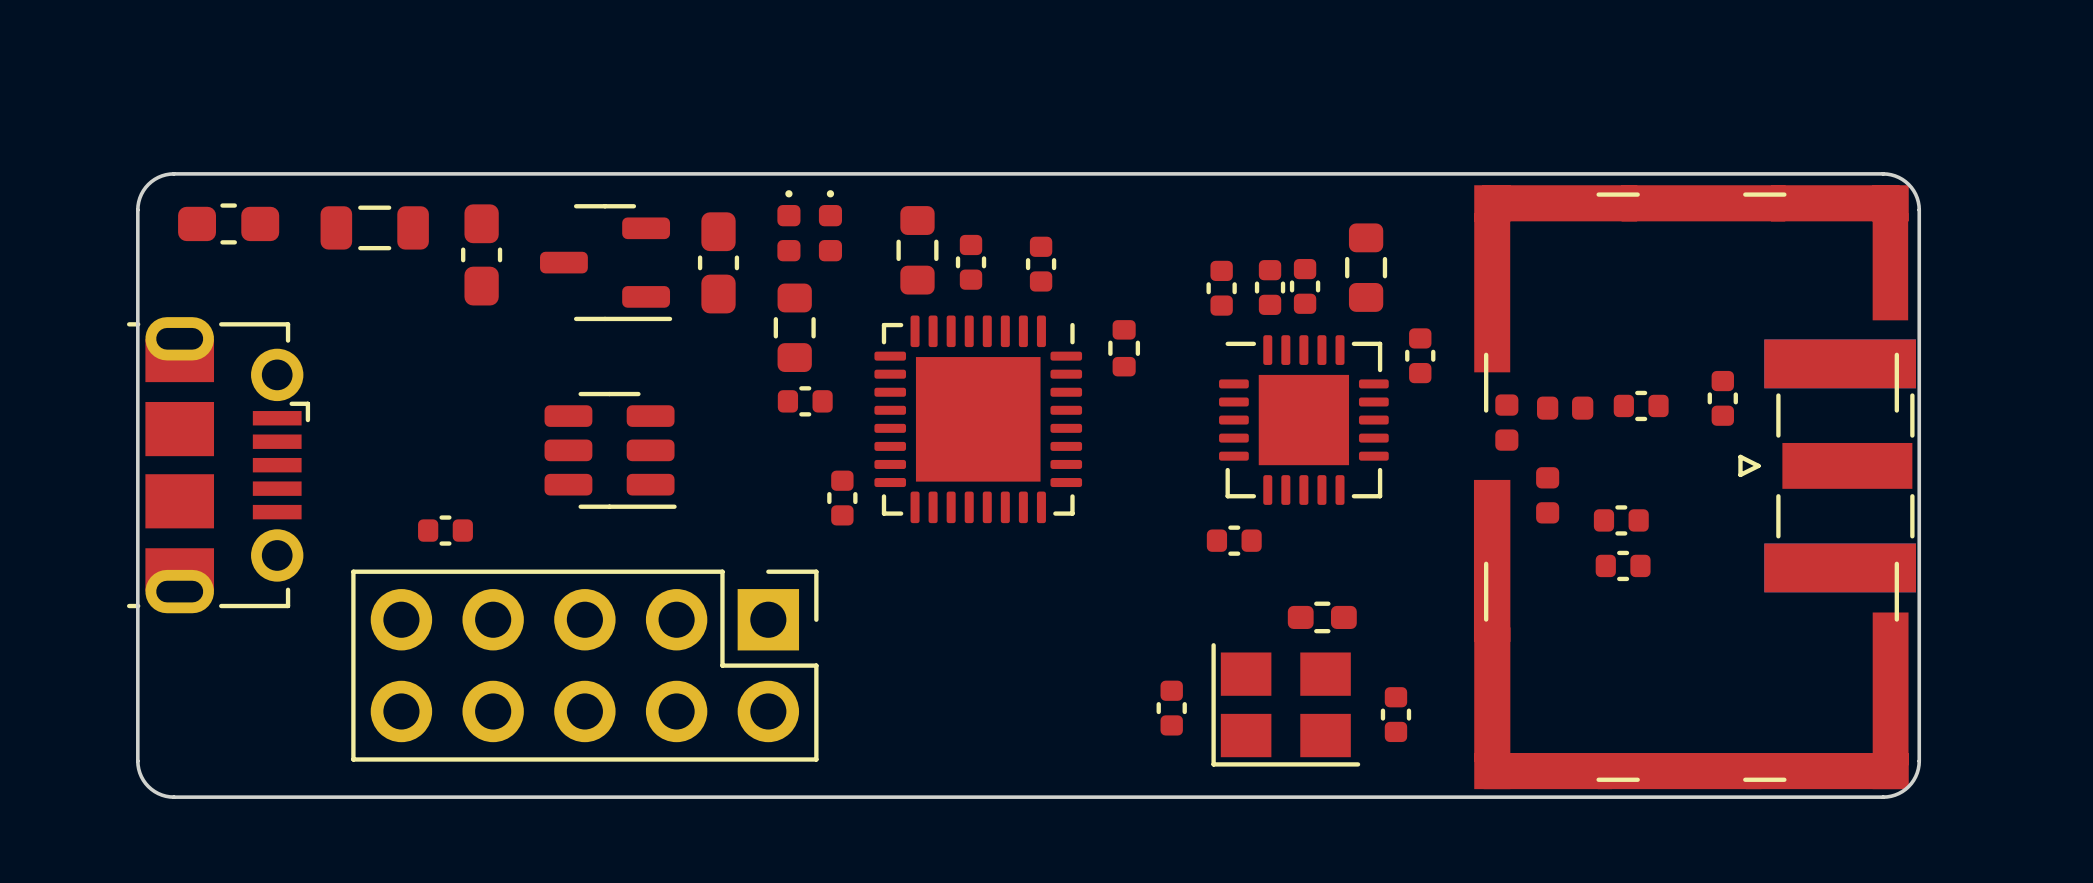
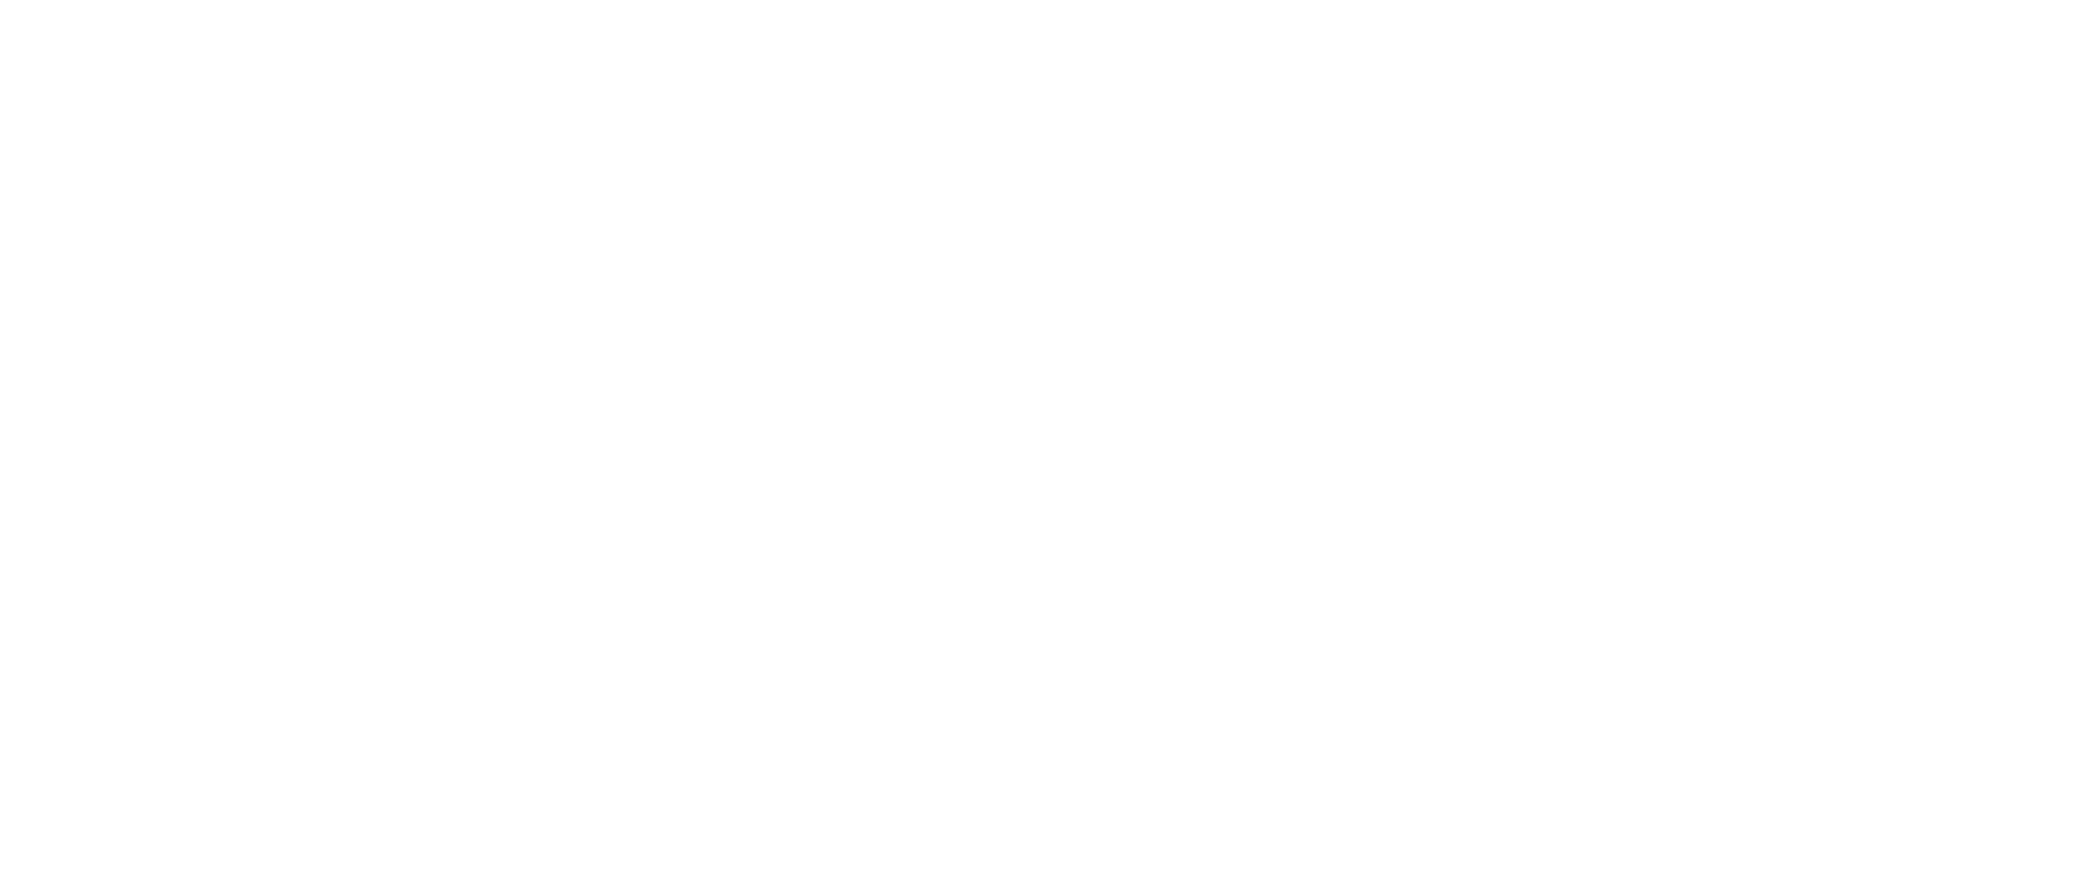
board edge: (173, 173) (1883, 173) (1895, 175) (1911, 187) (1917, 198) (1919, 210) (1919, 761) (1917, 772) (1911, 783) (1902, 791) (1883, 797) (173, 797) (162, 795) (151, 789) (143, 780) (137, 761) (137, 210) (141, 194) (148, 184) (162, 175) (173, 173) -> none
part: (228, 223) -> none
part: (788, 225) -> none
part: (830, 225) -> none
part: (374, 227) -> none
part: (917, 250) -> none
part: (481, 254) -> none
part: (606, 262) -> none
part: (718, 262) -> none
part: (971, 262) -> none
part: (1041, 264) -> none
part: (1366, 267) -> none
part: (1305, 286) -> none
part: (1270, 287) -> none
part: (1221, 288) -> none
part: (794, 327) -> none
part: (1124, 348) -> none
part: (1420, 355) -> none
part: (1722, 398) -> none
part: (805, 401) -> none
part: (1641, 405) -> none
part: (1565, 408) -> none
part: (978, 419) -> none
part: (1303, 420) -> none
part: (1506, 422) -> none
part: (610, 450) -> none
part: (218, 465) -> none
part: (1827, 465) -> none
part: (1691, 487) -> none
part: (1547, 495) -> none
part: (842, 498) -> none
part: (1621, 520) -> none
part: (445, 530) -> none
part: (1234, 540) -> none
part: (1623, 565) -> none
part: (1322, 617) -> none
part: (584, 665) -> none
part: (1285, 704) -> none
part: (1171, 708) -> none
part: (1395, 714) -> none

